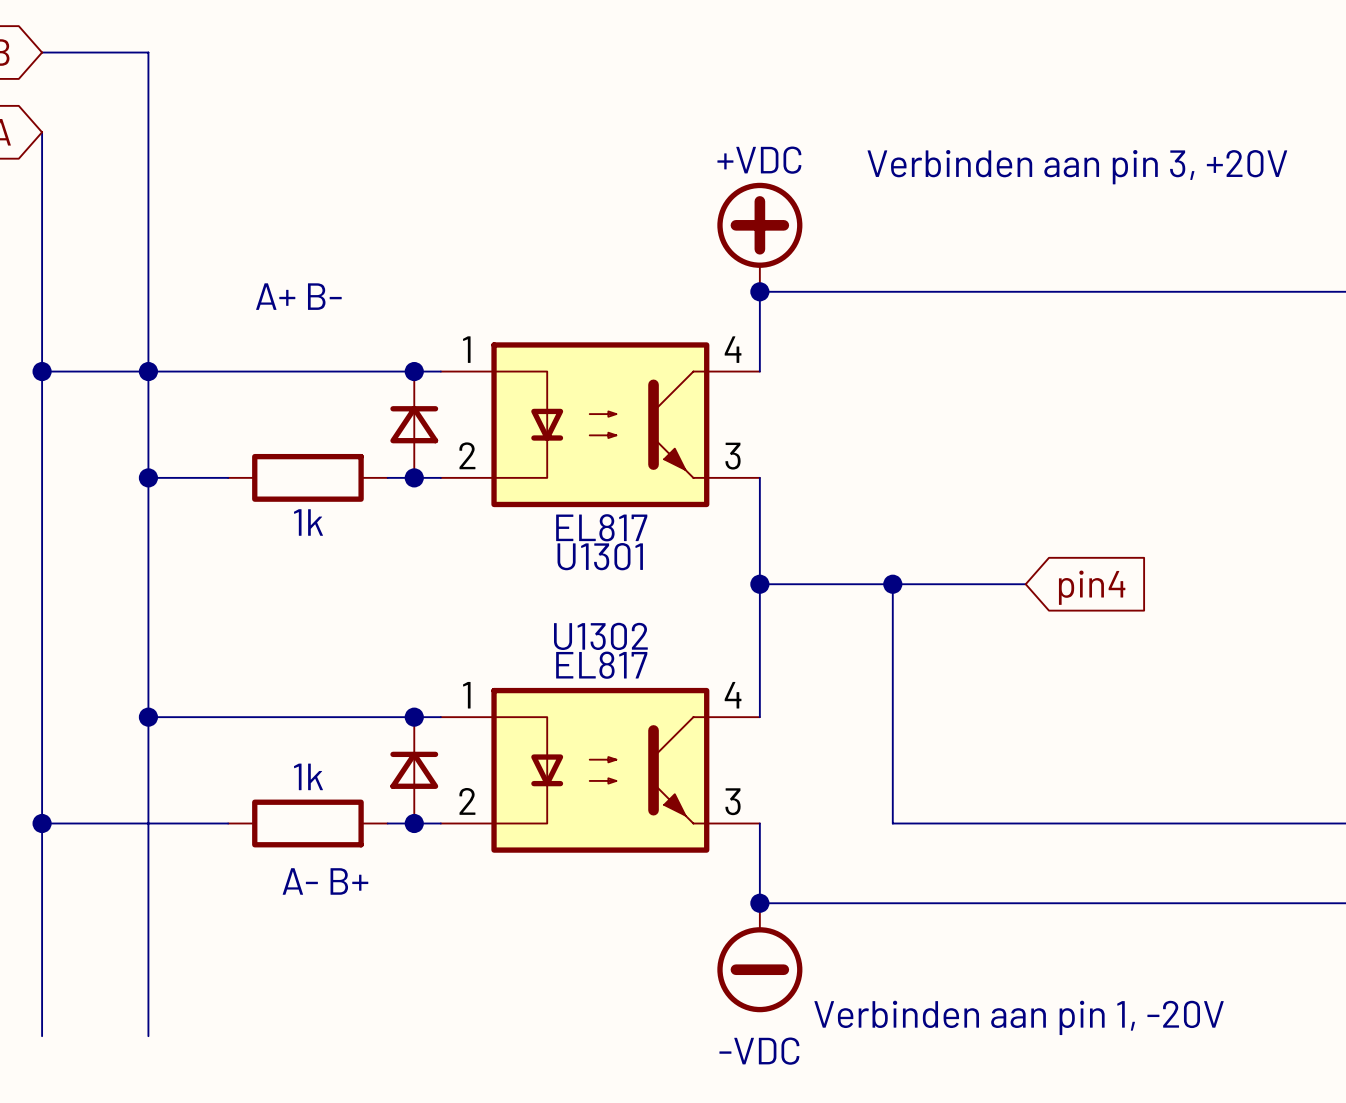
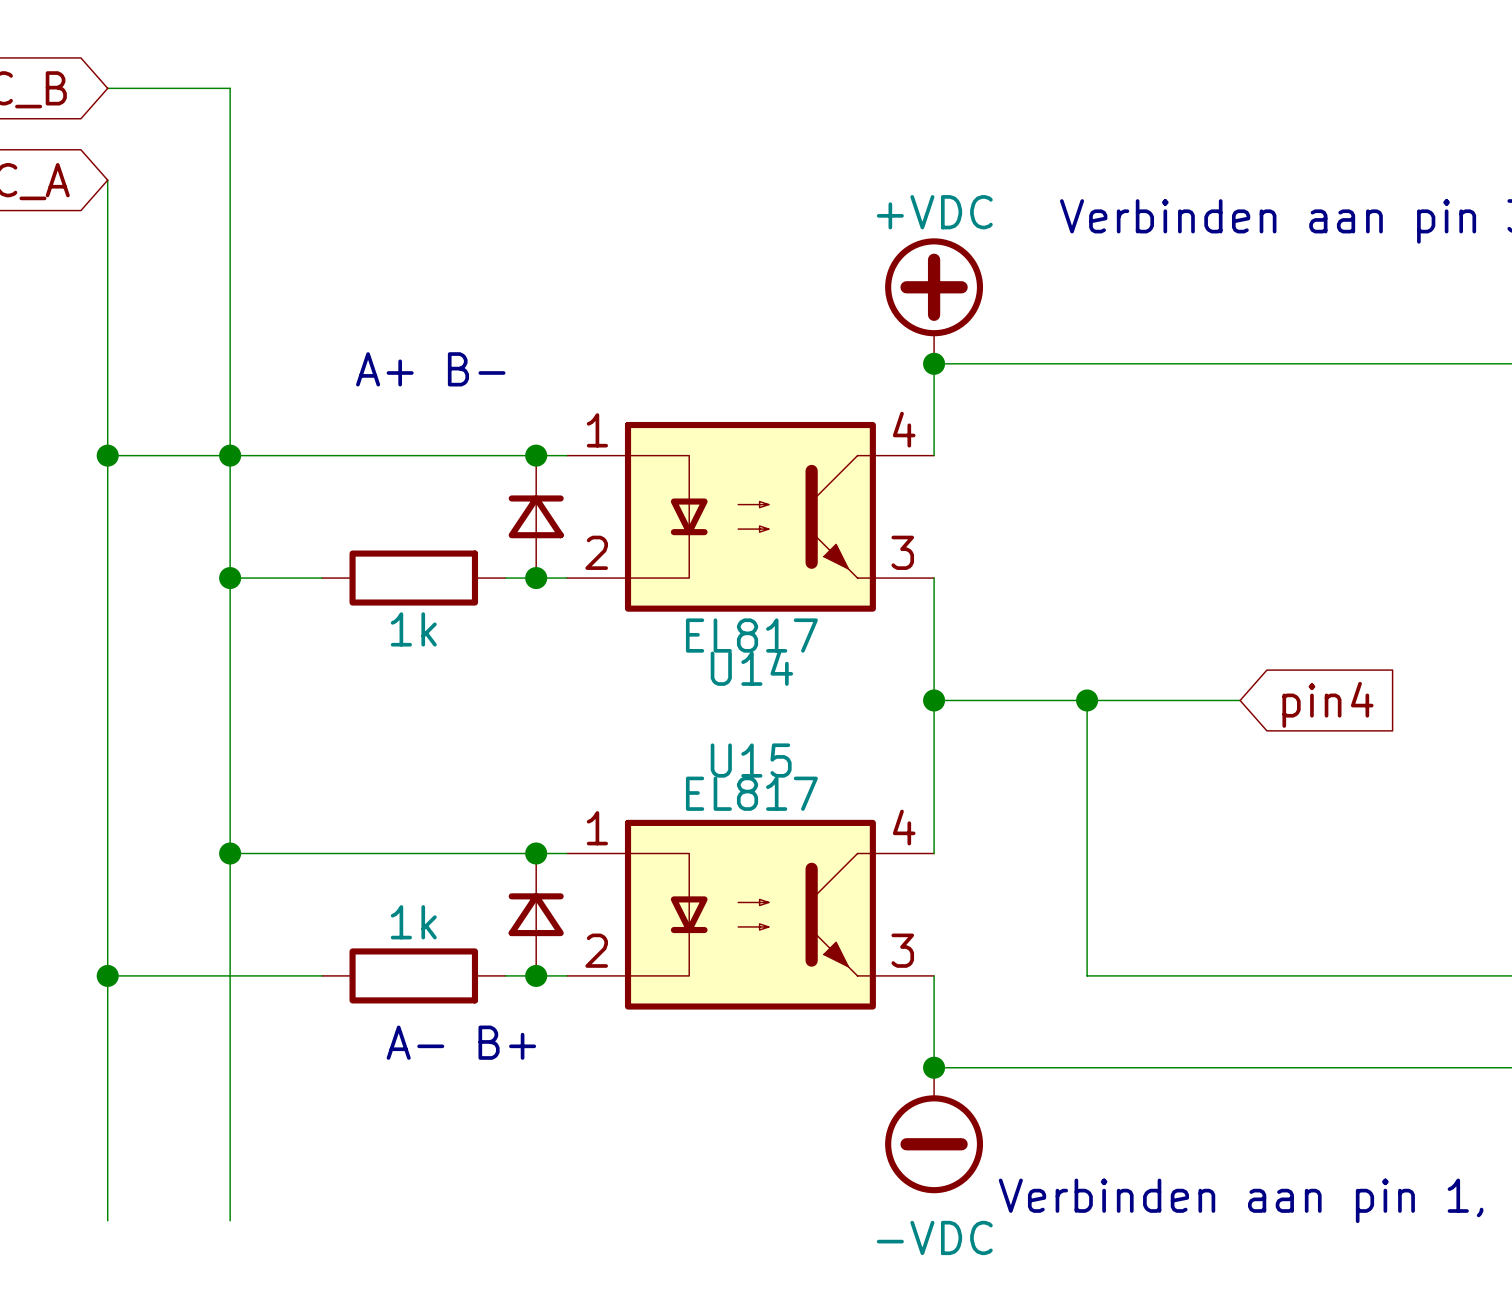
U1301 name: U1301 (600, 556) -> U14 (751, 667)
U1302 name: U1302 (600, 636) -> U15 (751, 760)

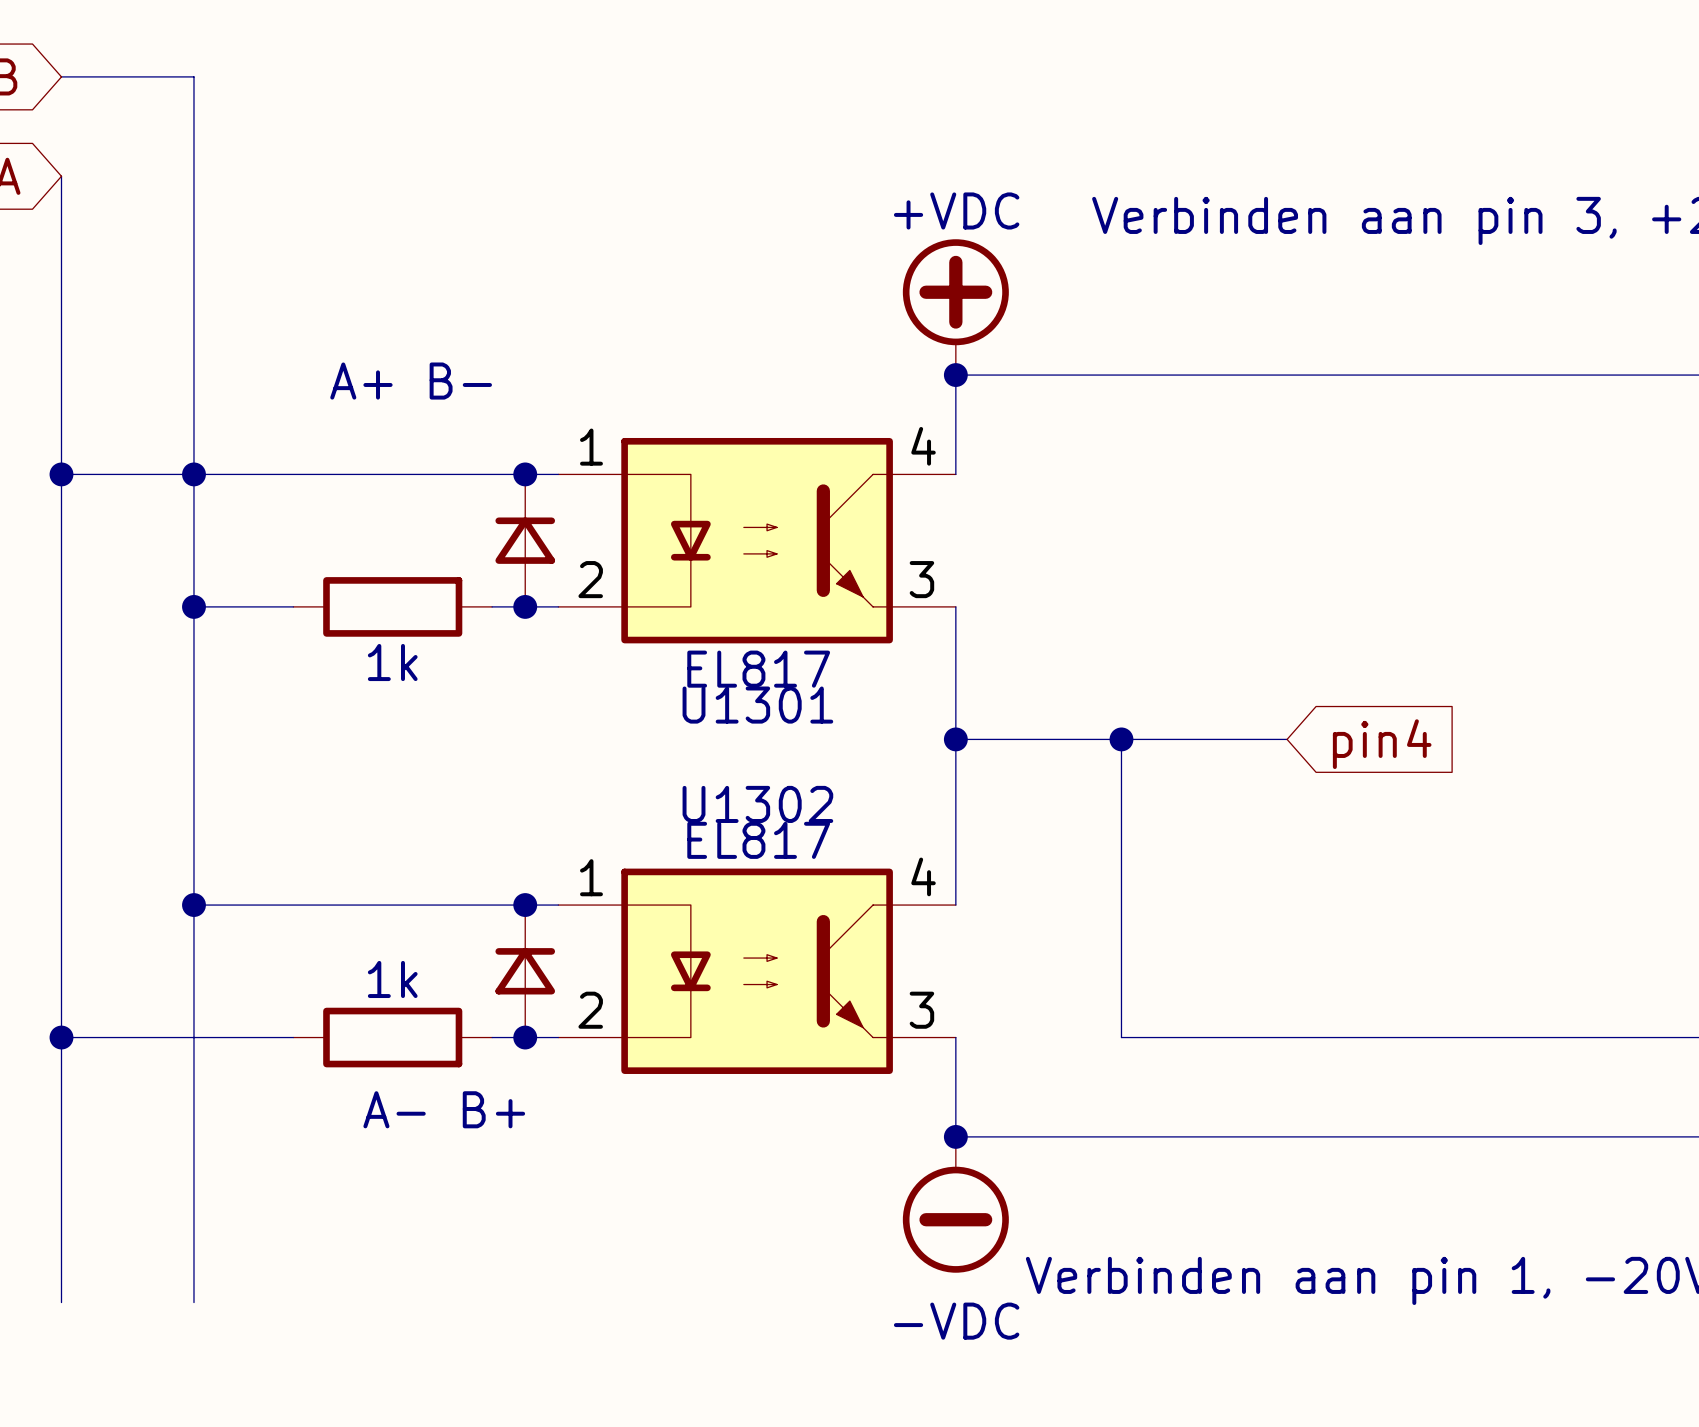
U14 name: U14 (751, 667) -> U1301 (757, 705)
U15 name: U15 (751, 760) -> U1302 (757, 804)

